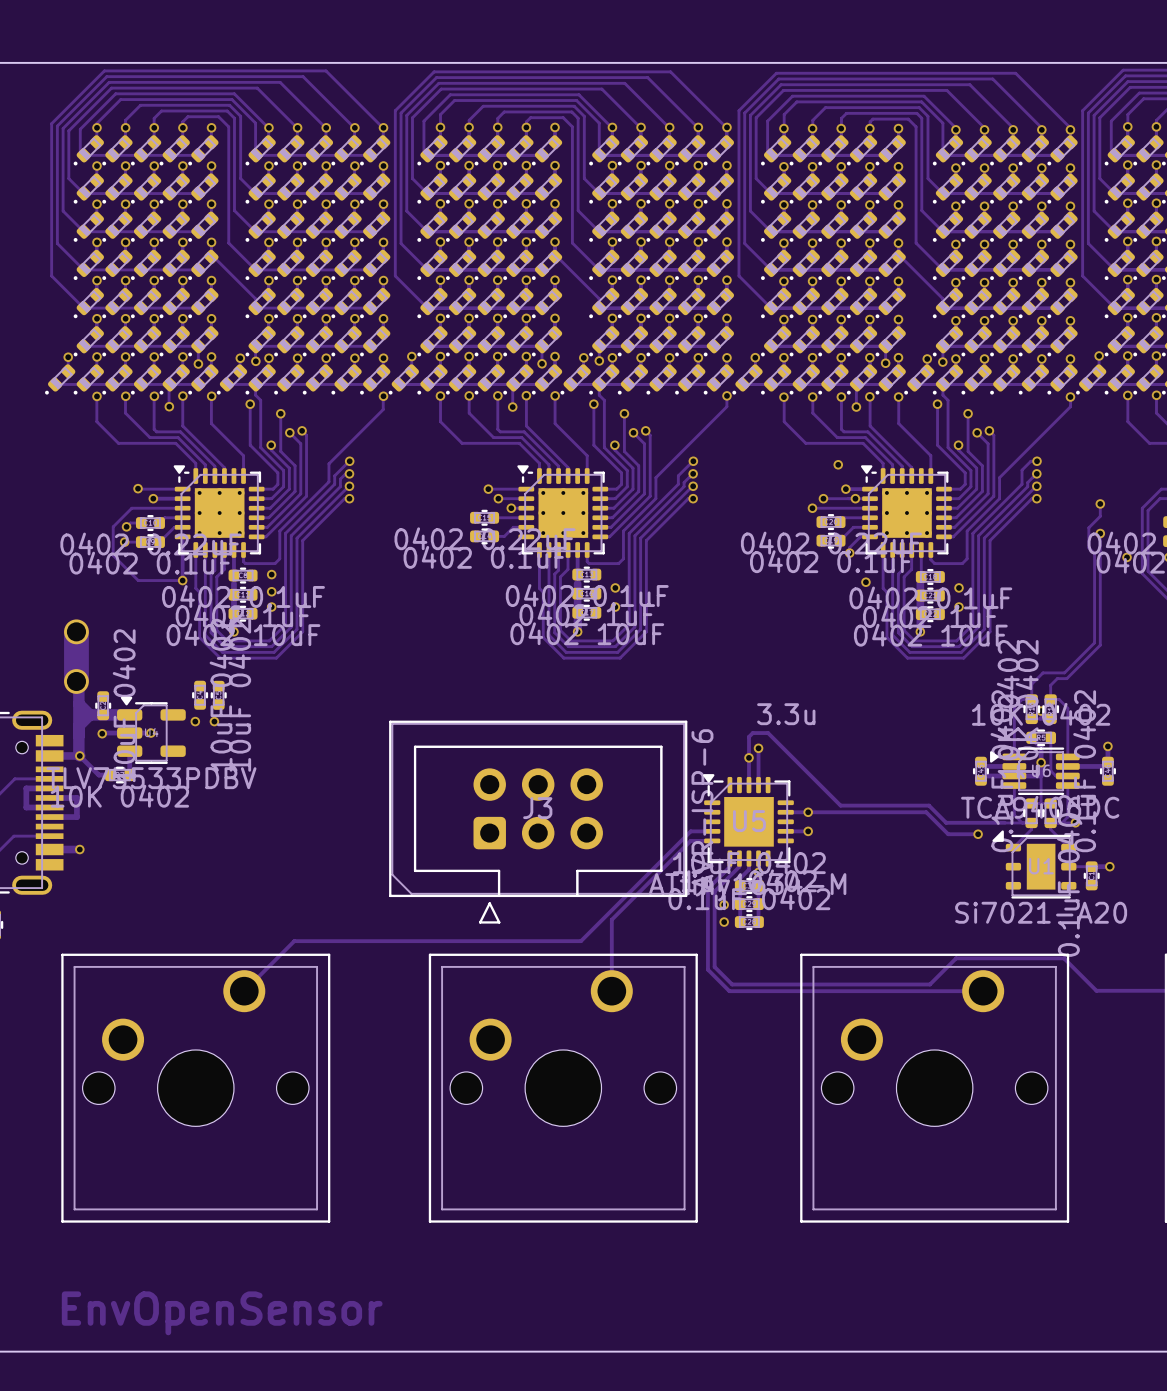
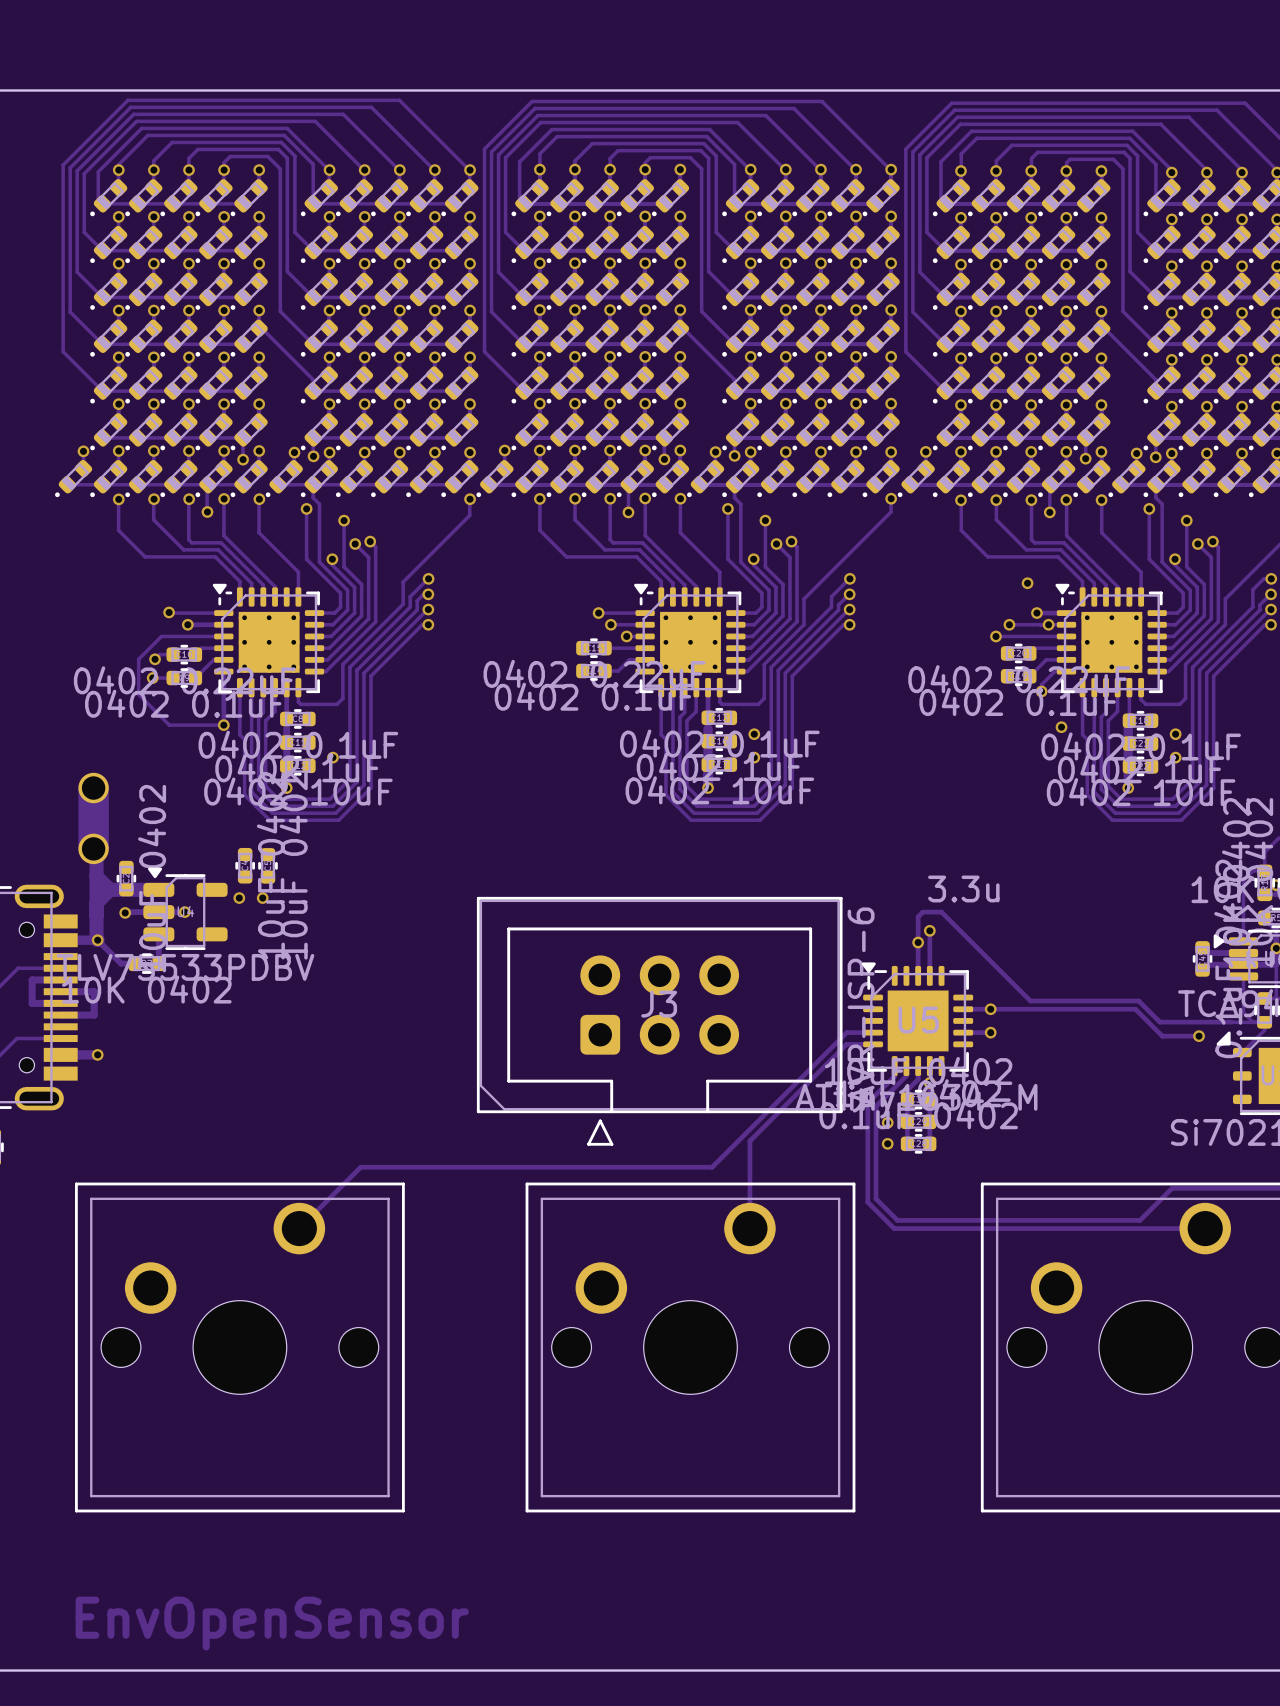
via: (271, 574) -> none
via: (271, 591) -> none

